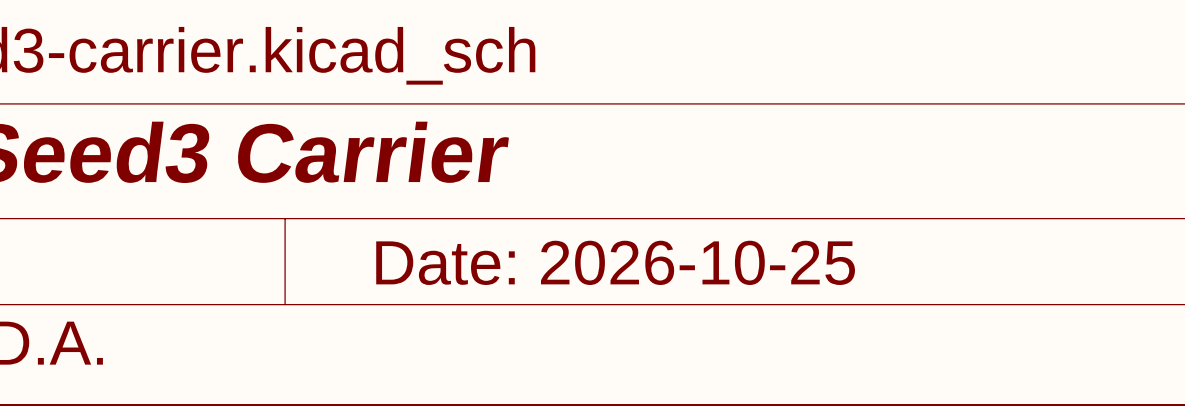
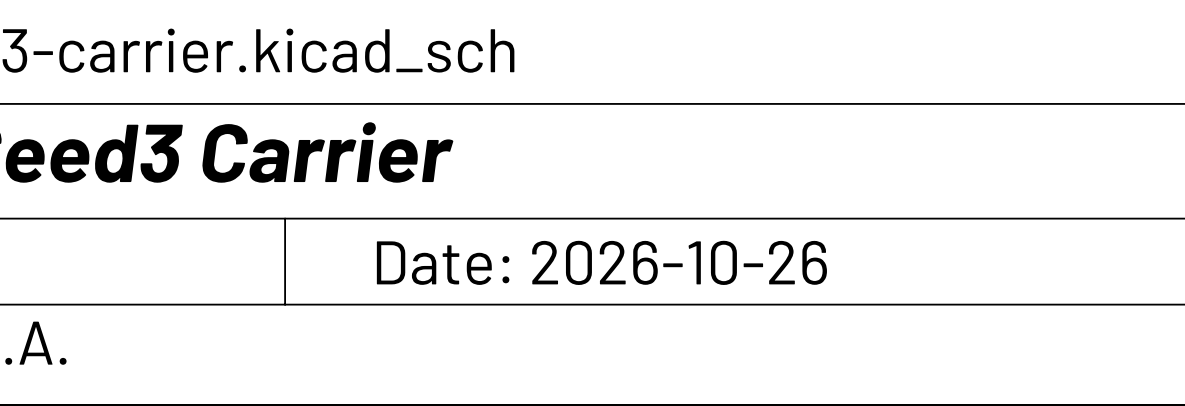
title block: Date: 2026-10-25 (615, 262) -> Date: 2026-10-26 (601, 262)

